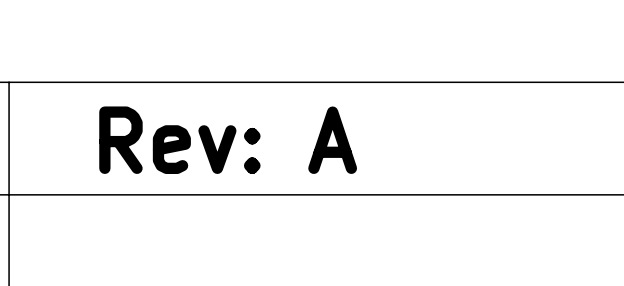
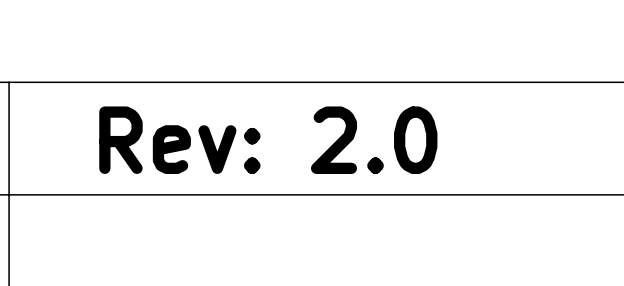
title block: Rev: A (228, 140) -> Rev: 2.0 (268, 140)

